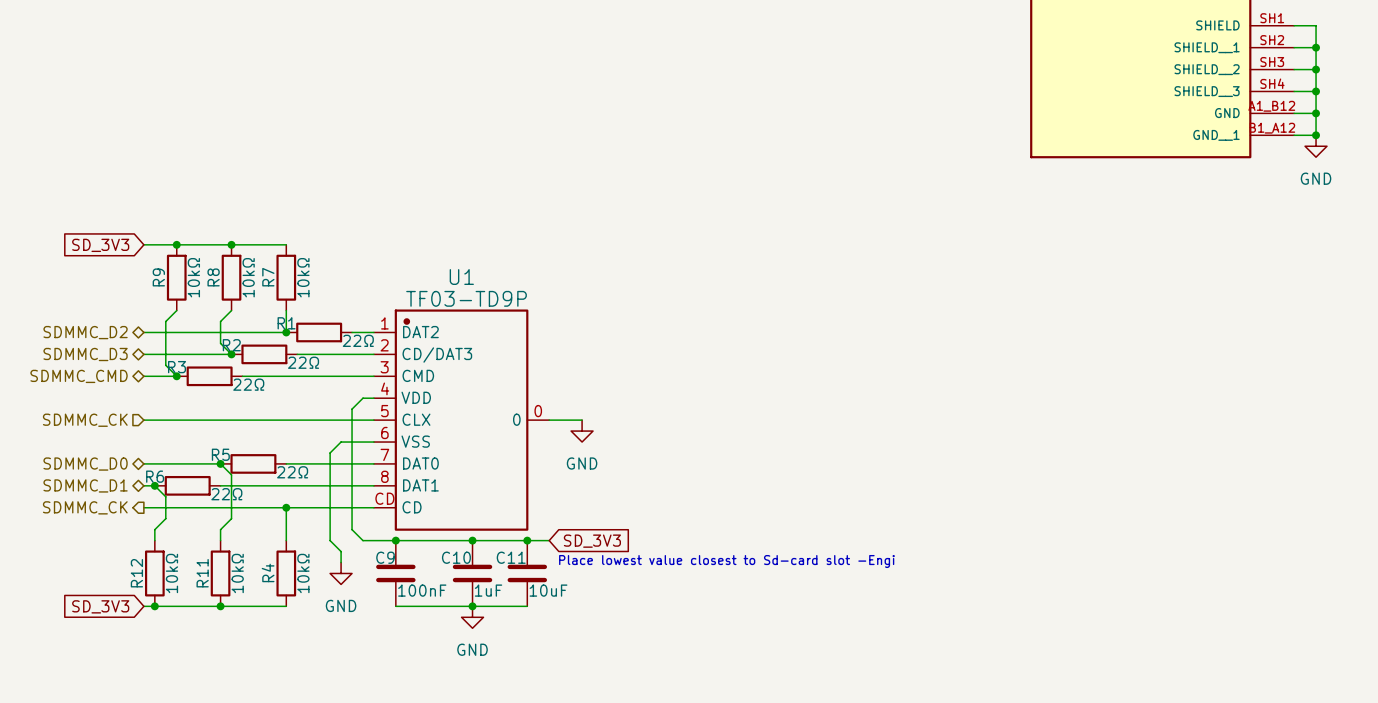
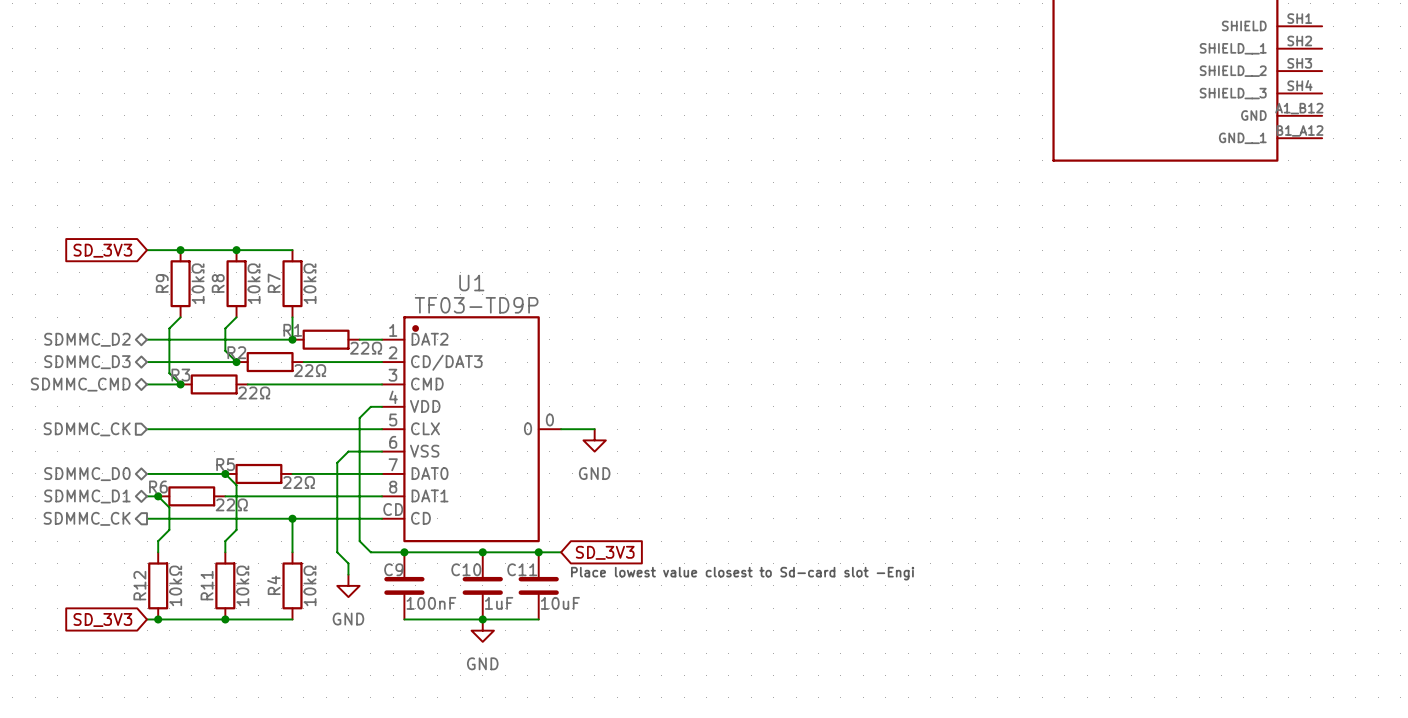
wire: (1294, 25) (1316, 25) (1316, 135) (1294, 135) -> none
wire: (1294, 47) (1316, 47) -> none
junction: (1316, 47) -> none
wire: (1294, 69) (1316, 69) -> none
junction: (1316, 69) -> none
wire: (1294, 91) (1316, 91) -> none
junction: (1316, 91) -> none
wire: (1294, 113) (1316, 113) -> none
junction: (1316, 113) -> none
junction: (1316, 135) -> none
power symbol: GND (1316, 146) -> none

